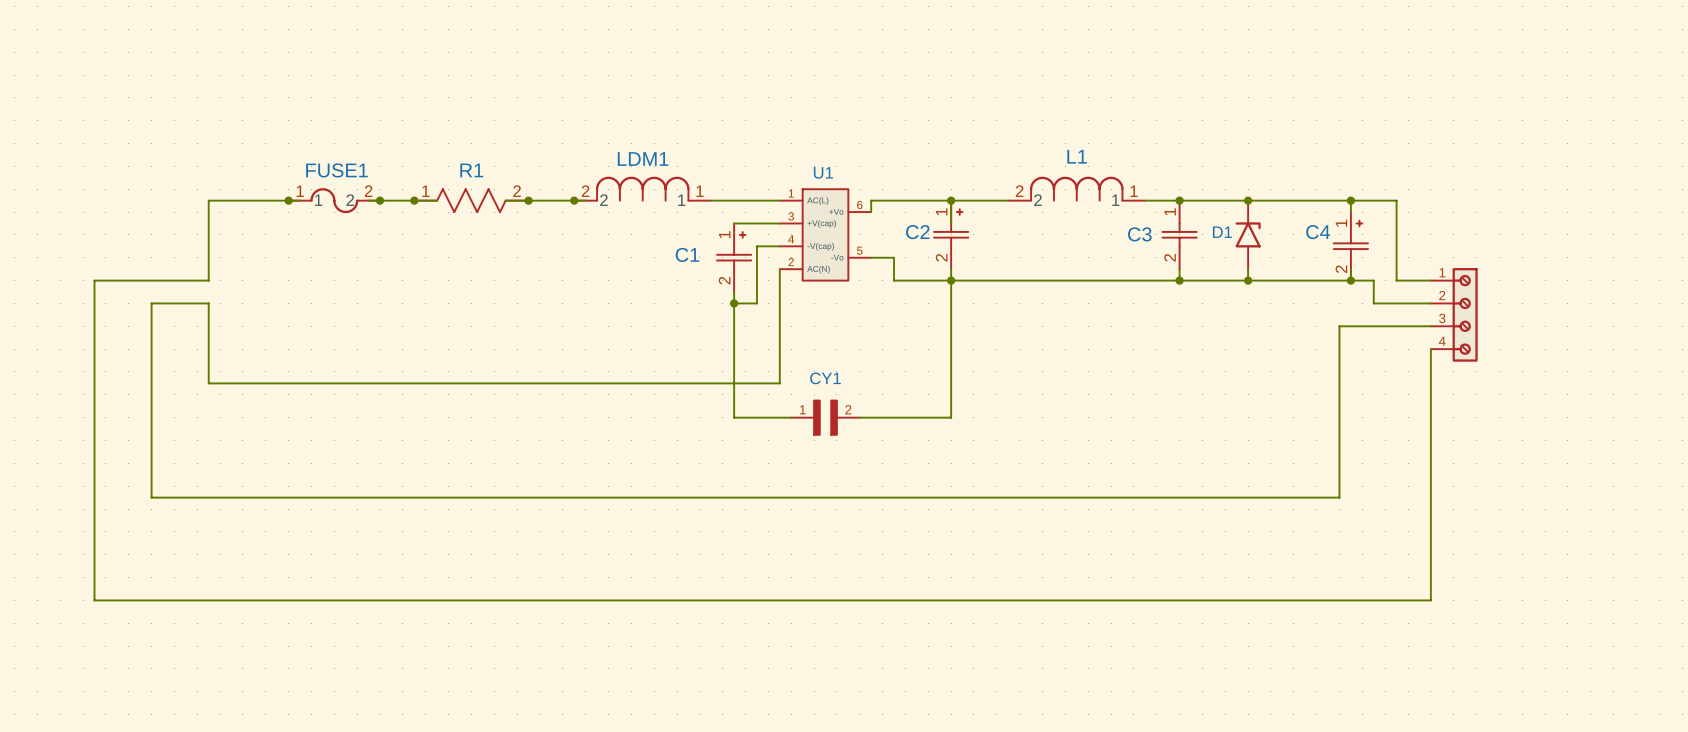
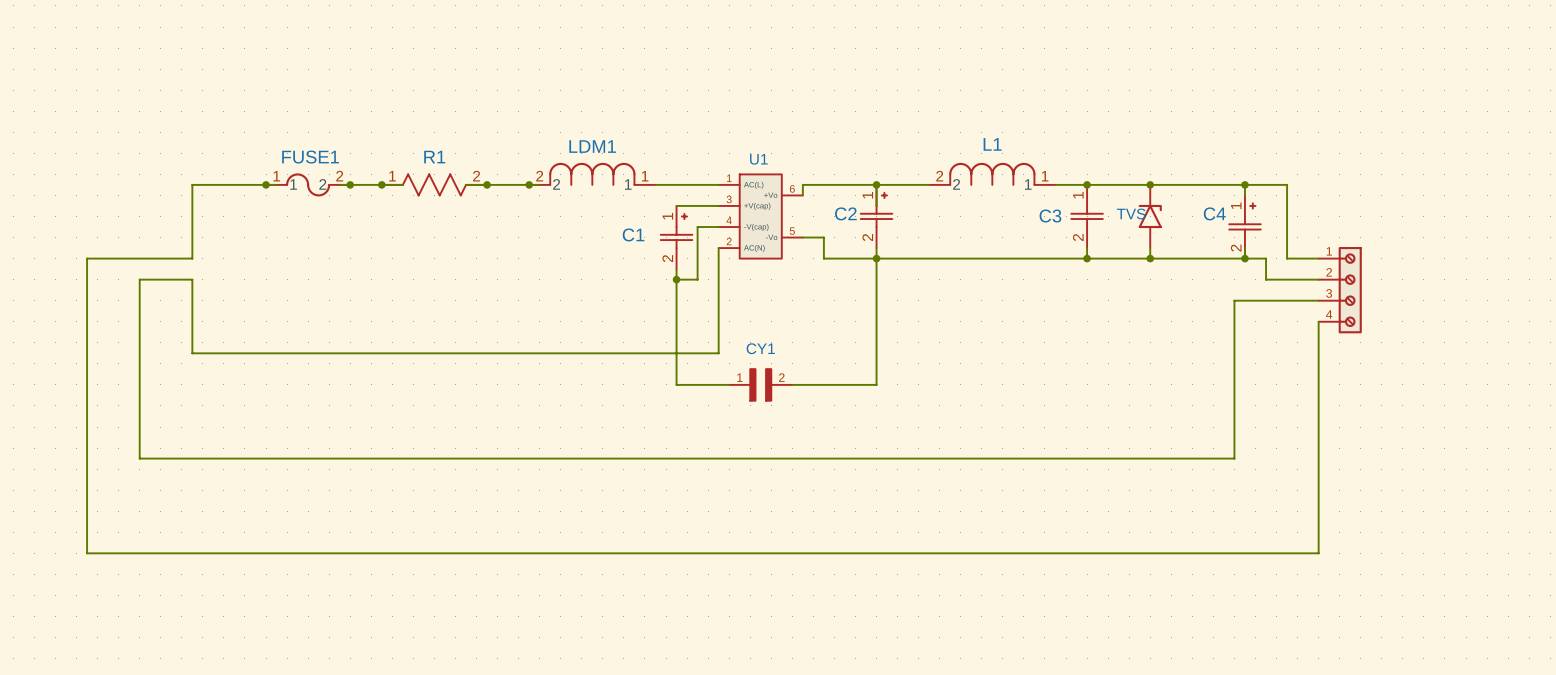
D1 name: D1 (1222, 232) -> TVS (1131, 213)

